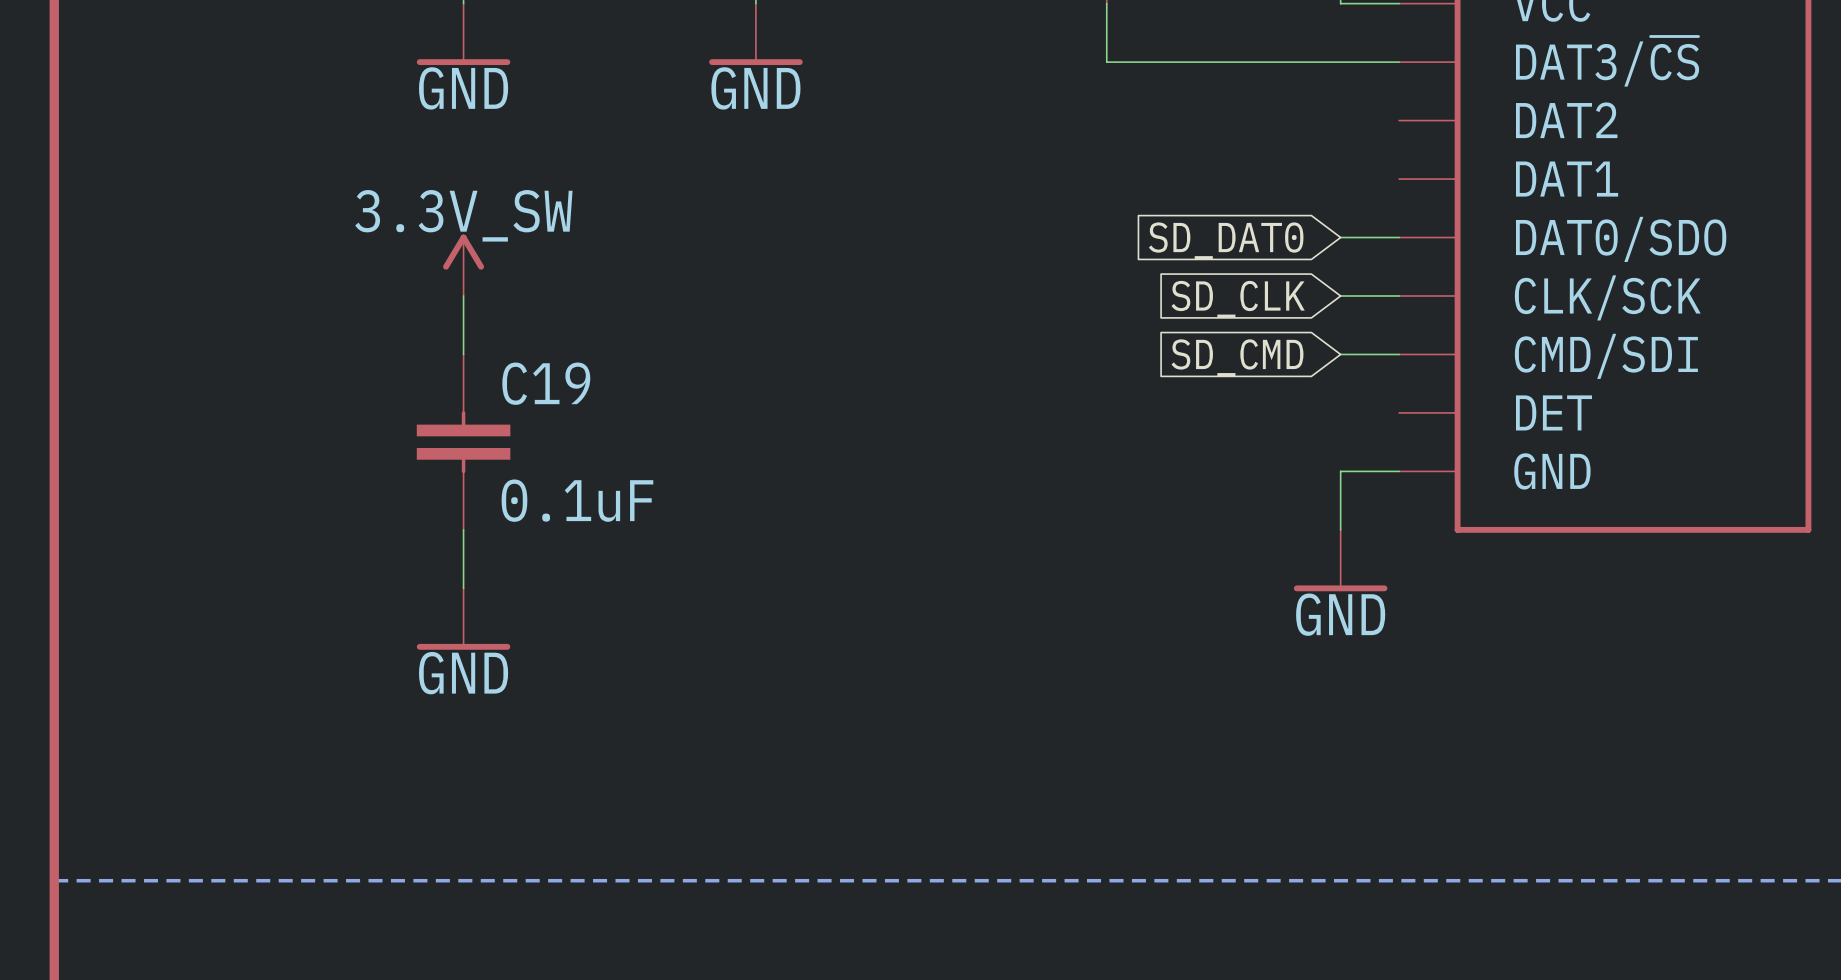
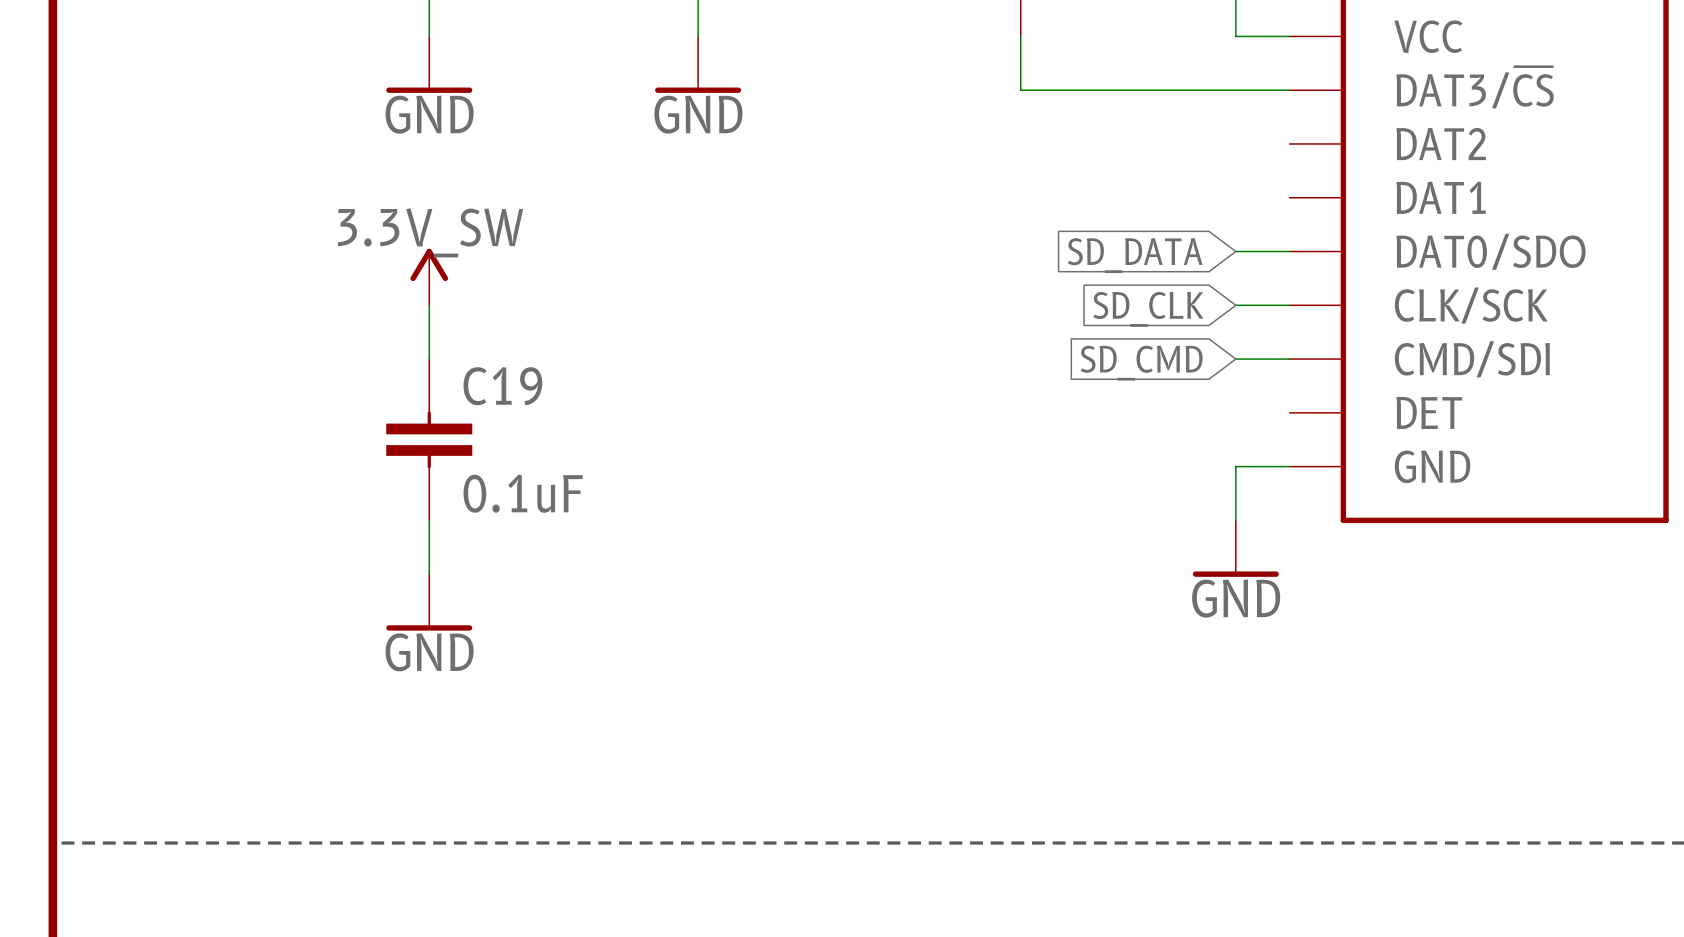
global label: SD_DAT0 (1226, 240) -> SD_DATA (1135, 255)

